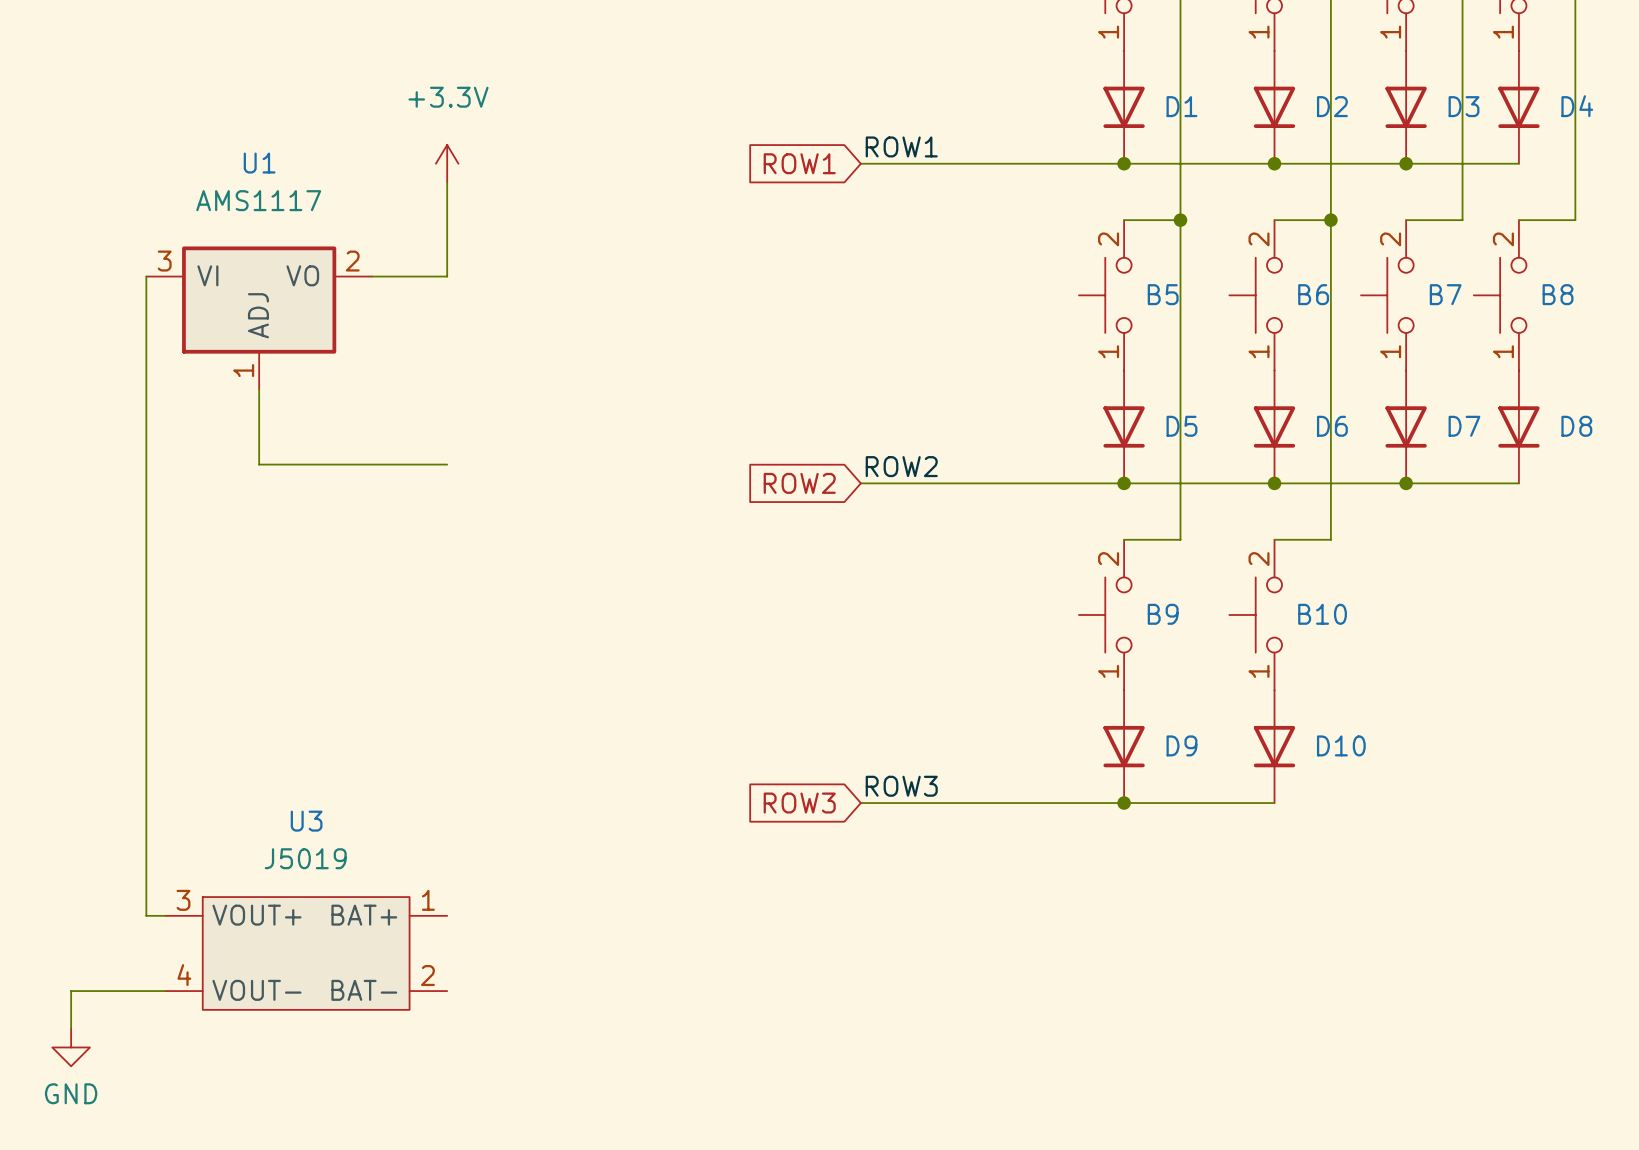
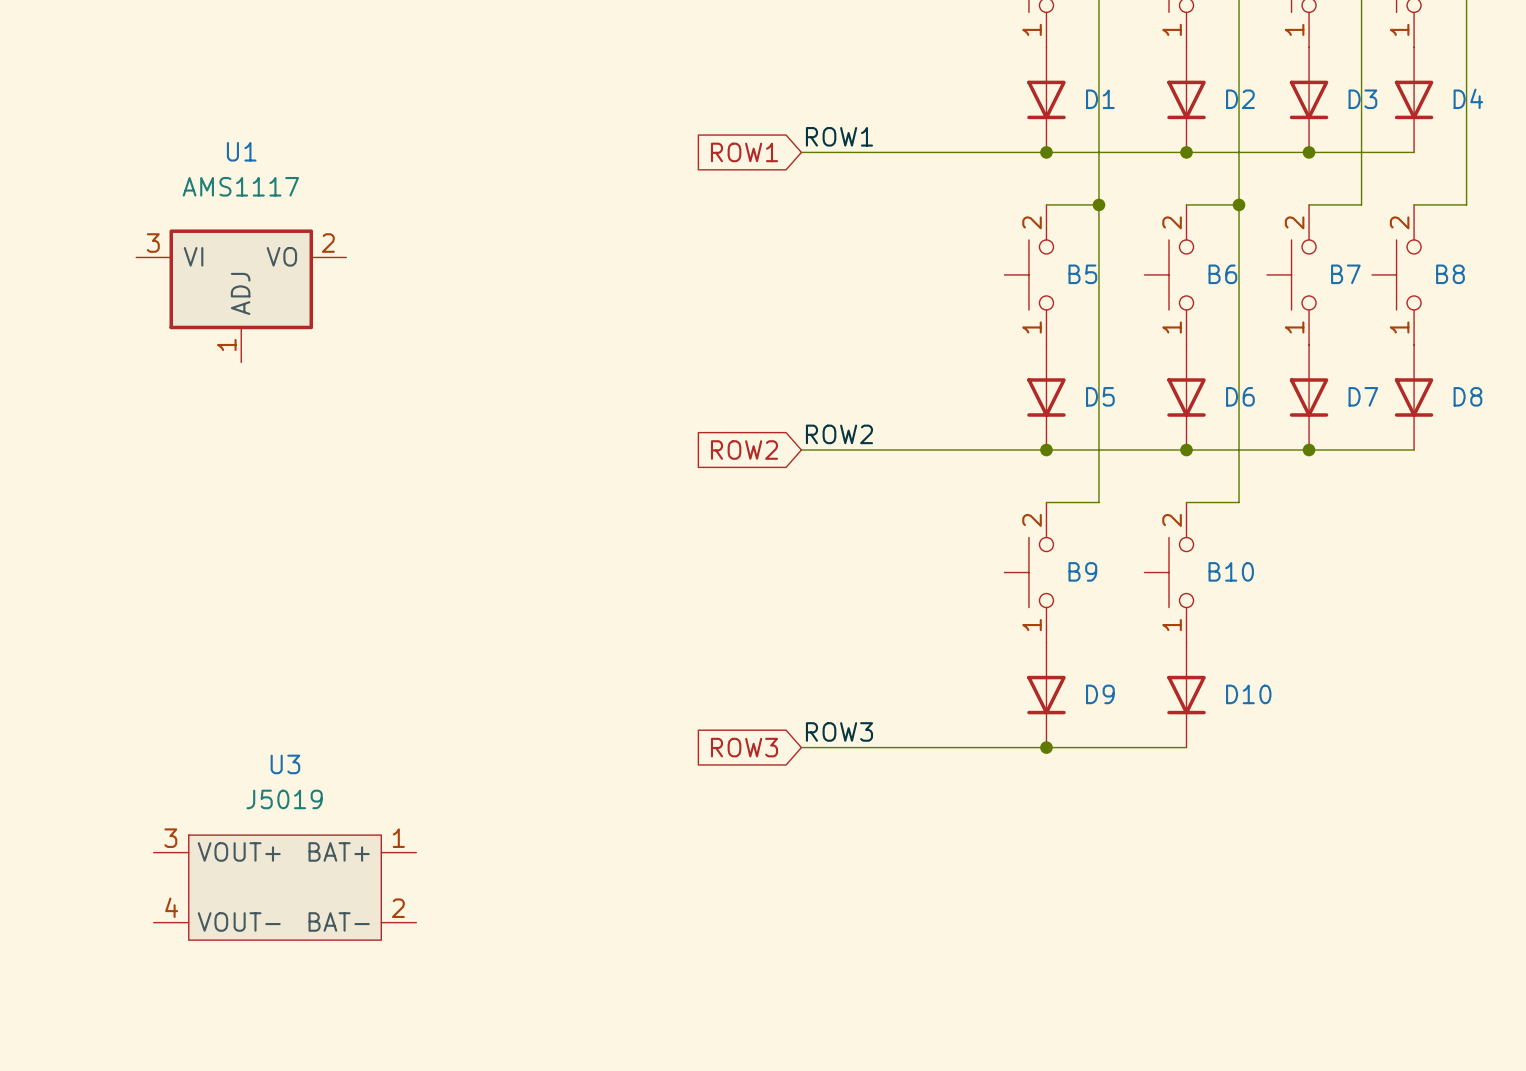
power symbol: +3.3V (447, 163) -> none
wire: (447, 182) (447, 276) (371, 276) -> none
wire: (146, 276) (146, 915) (165, 915) -> none
wire: (259, 389) (259, 464) (447, 464) -> none
wire: (165, 991) (71, 991) (71, 1028) -> none
power symbol: GND (71, 1047) -> none

